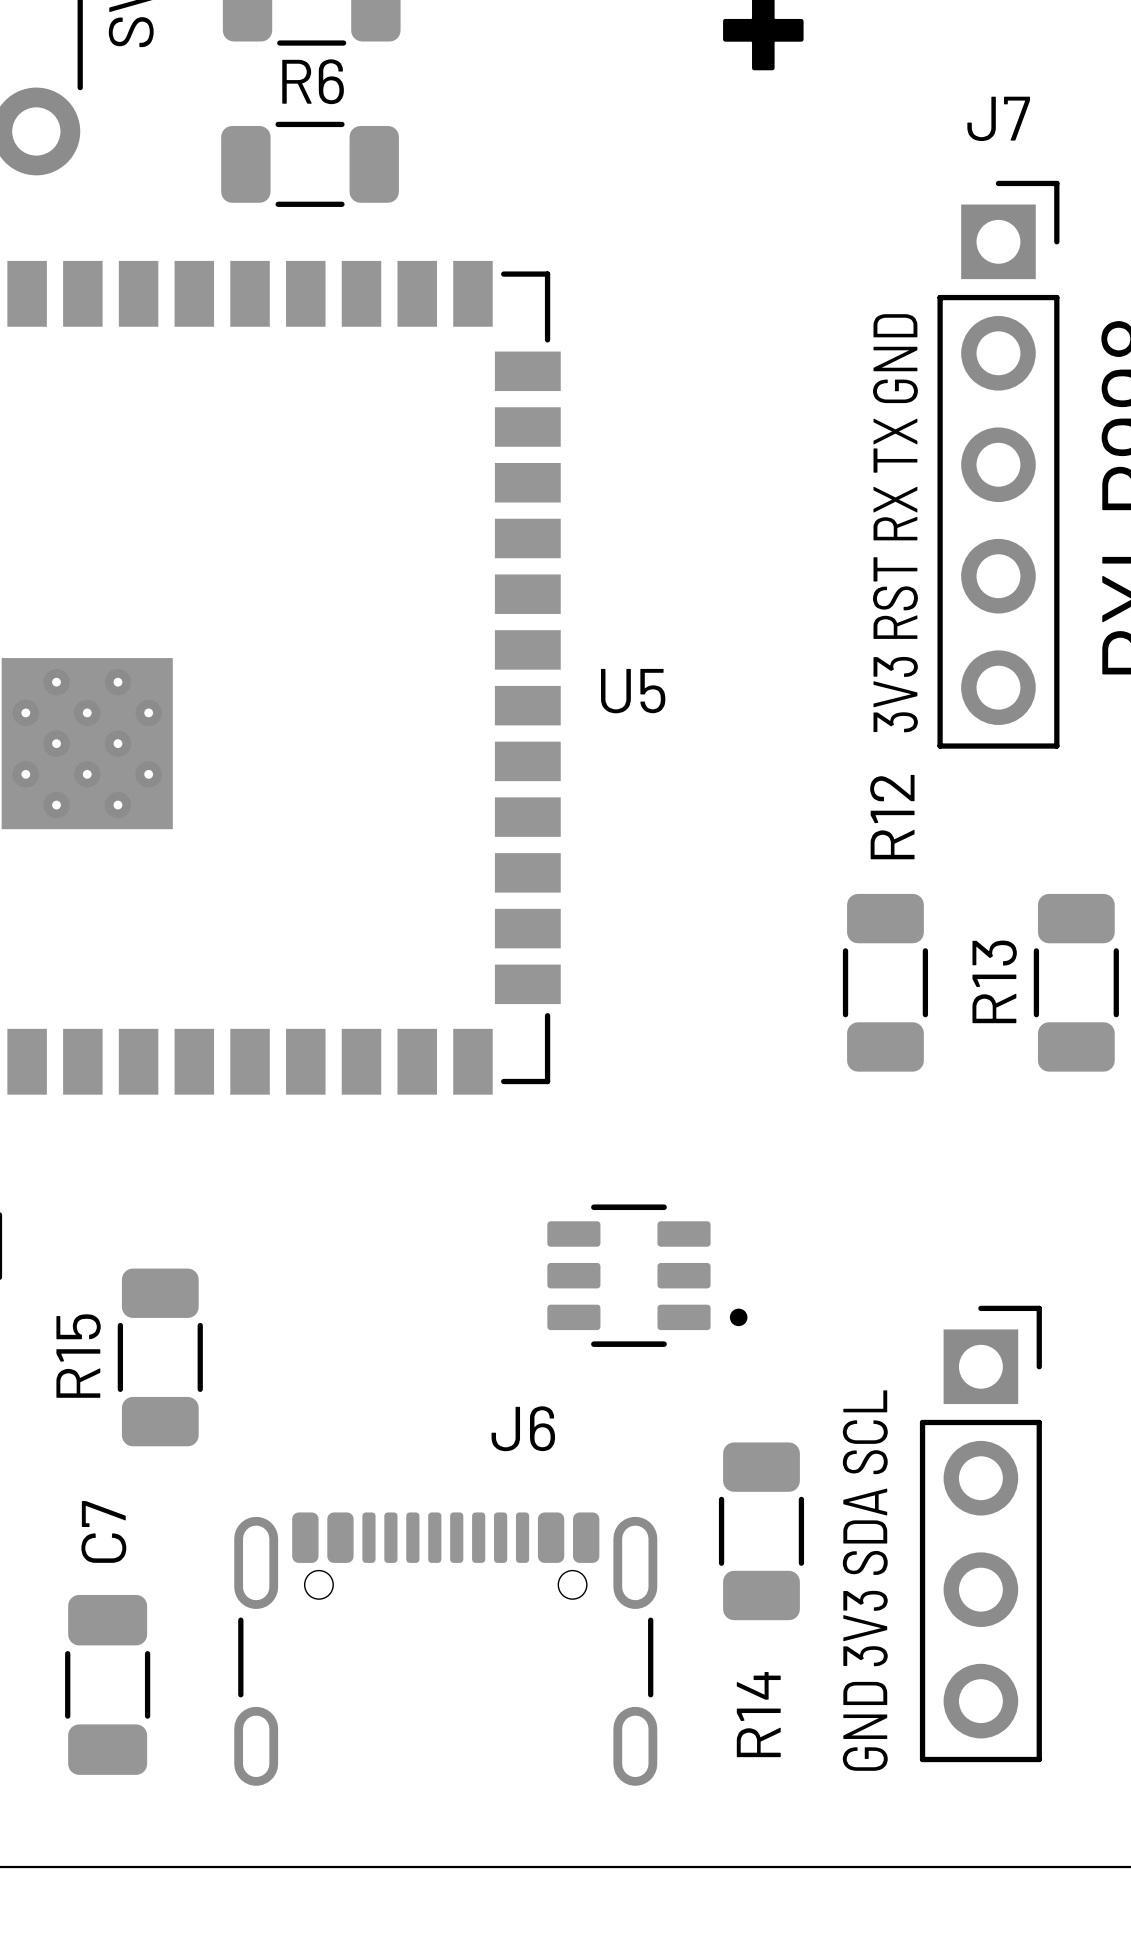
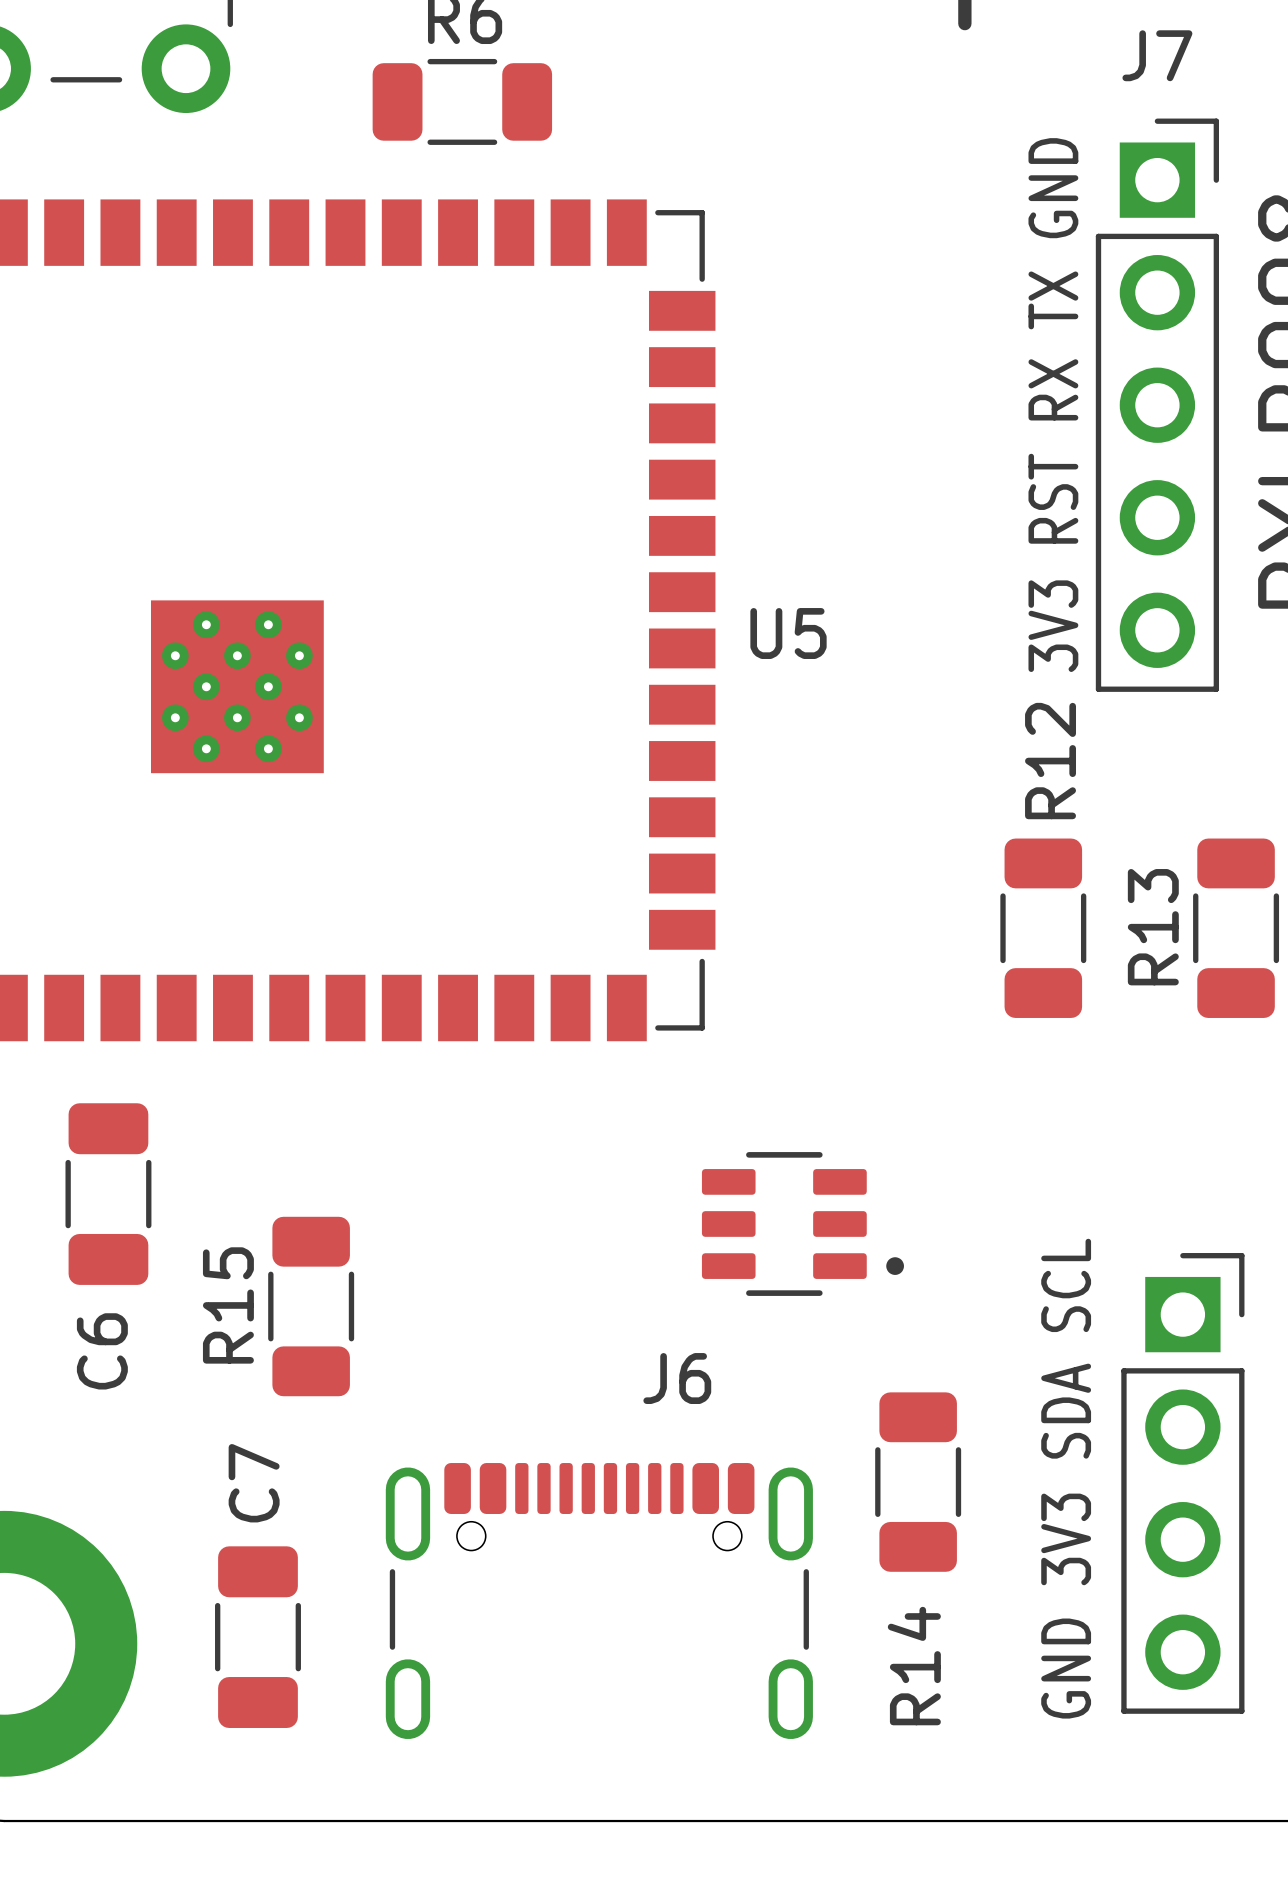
part position: (980, 1533) -> (1182, 1483)
text position: GND 3V3 SDA SCL (865, 1580) -> GND 3V3 SDA SCL (1066, 1478)

